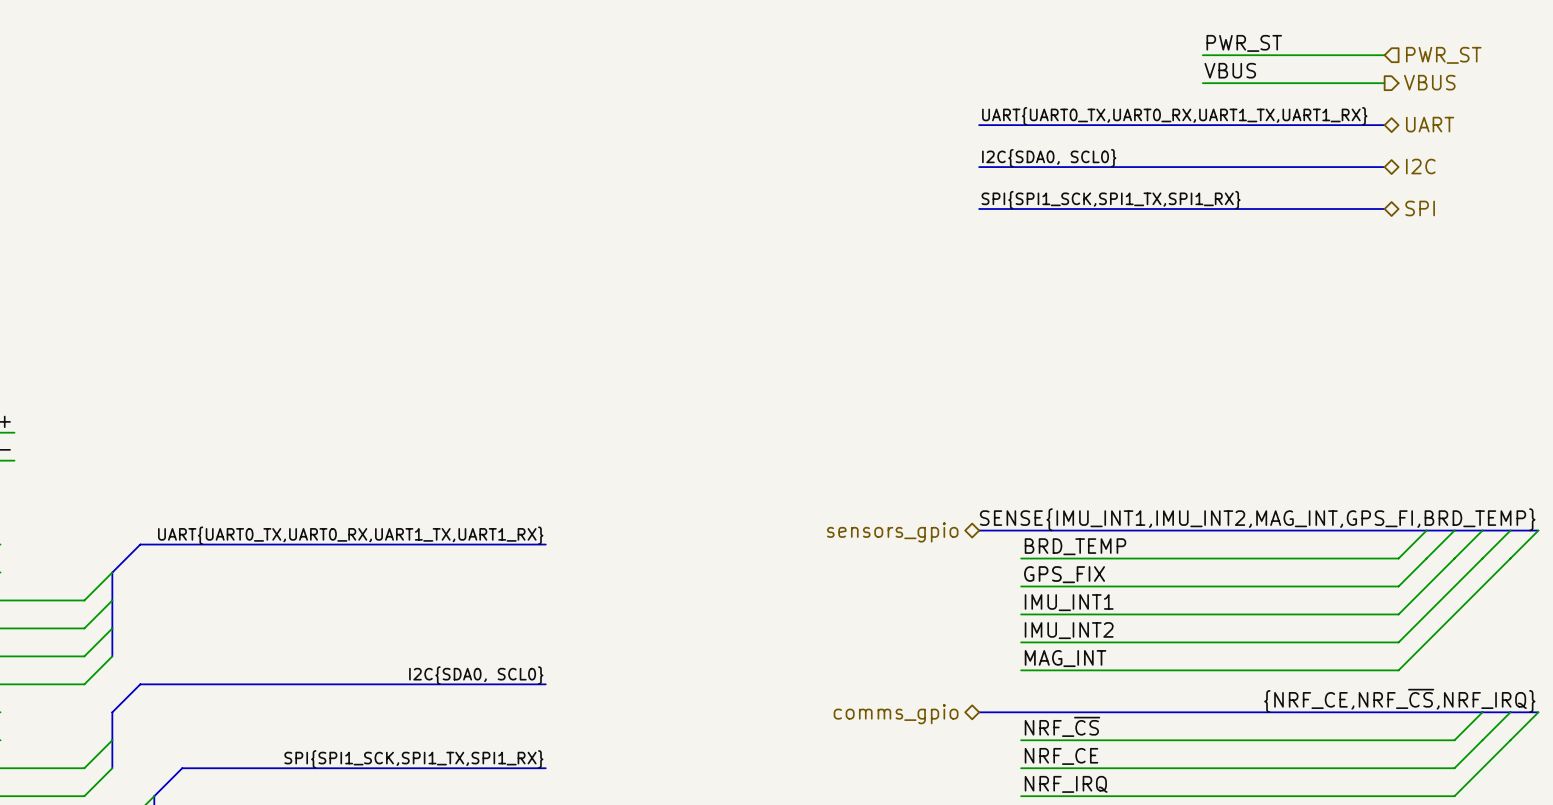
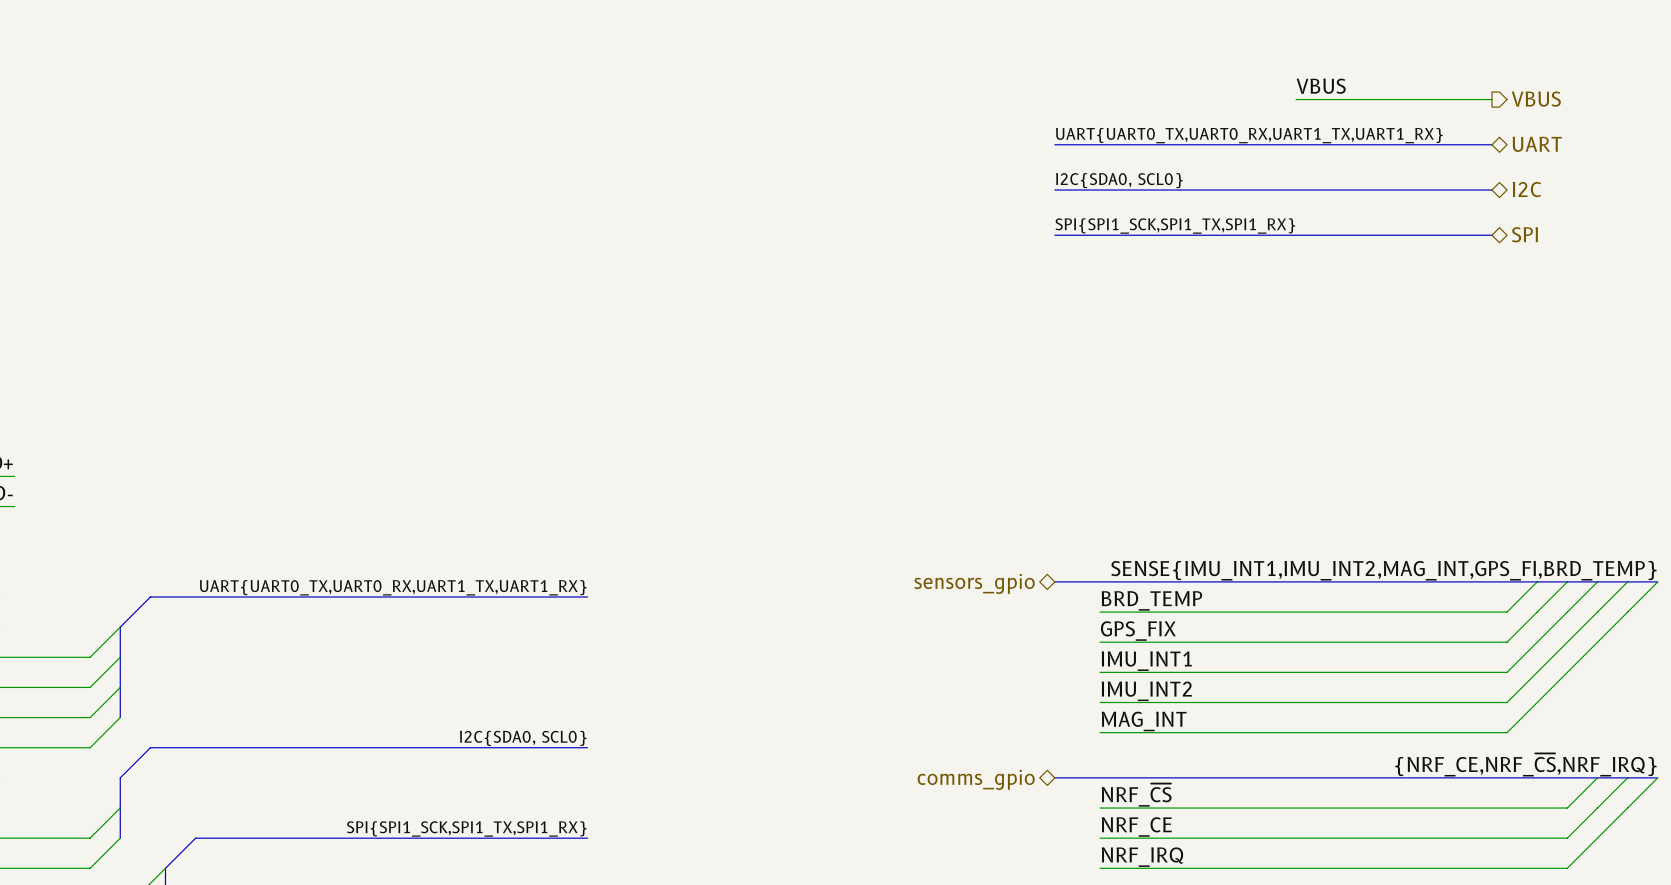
label: PWR_ST (1244, 43) -> none
wire: (1202, 55) (1384, 55) -> none
hierarchical label: PWR_ST (1443, 55) -> none

